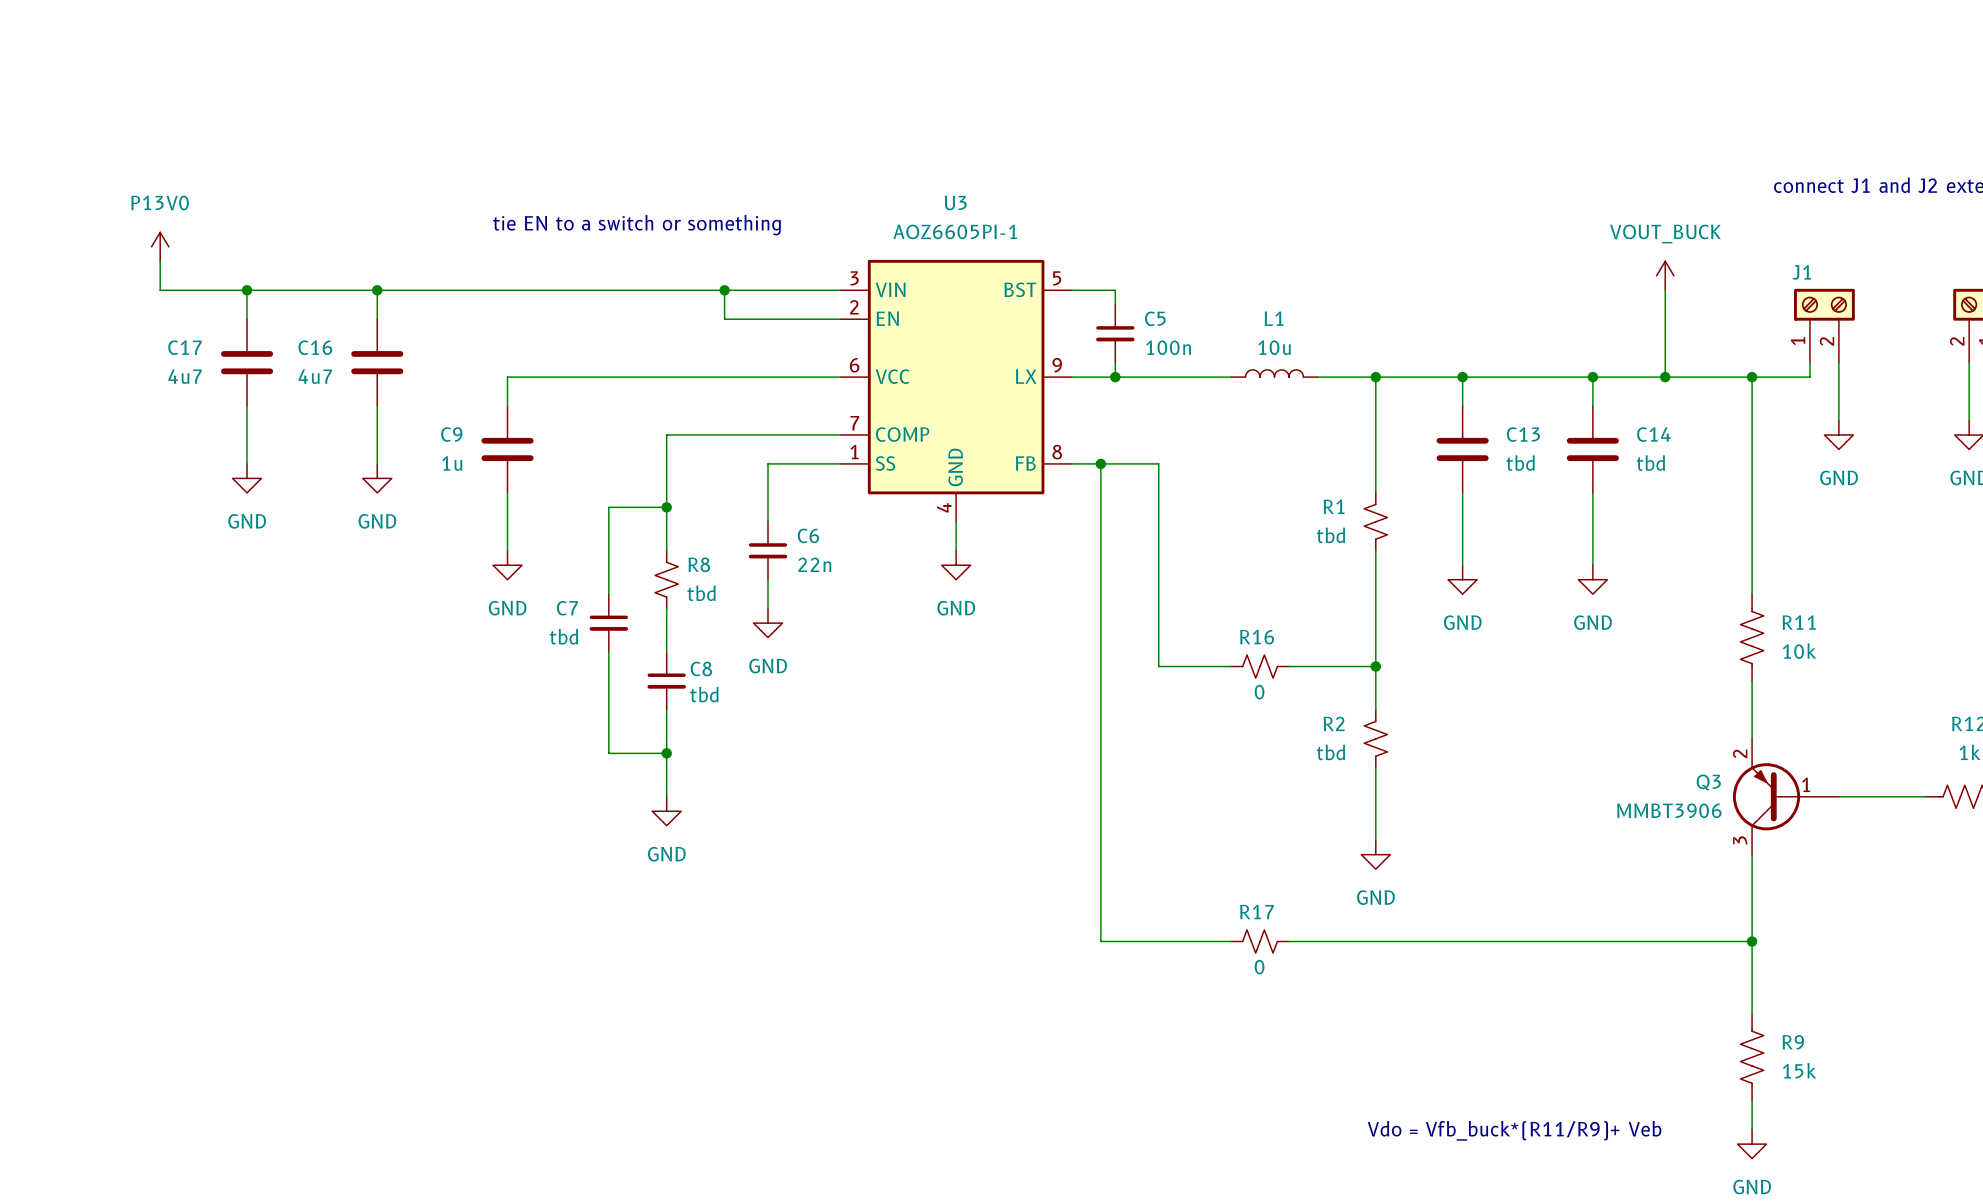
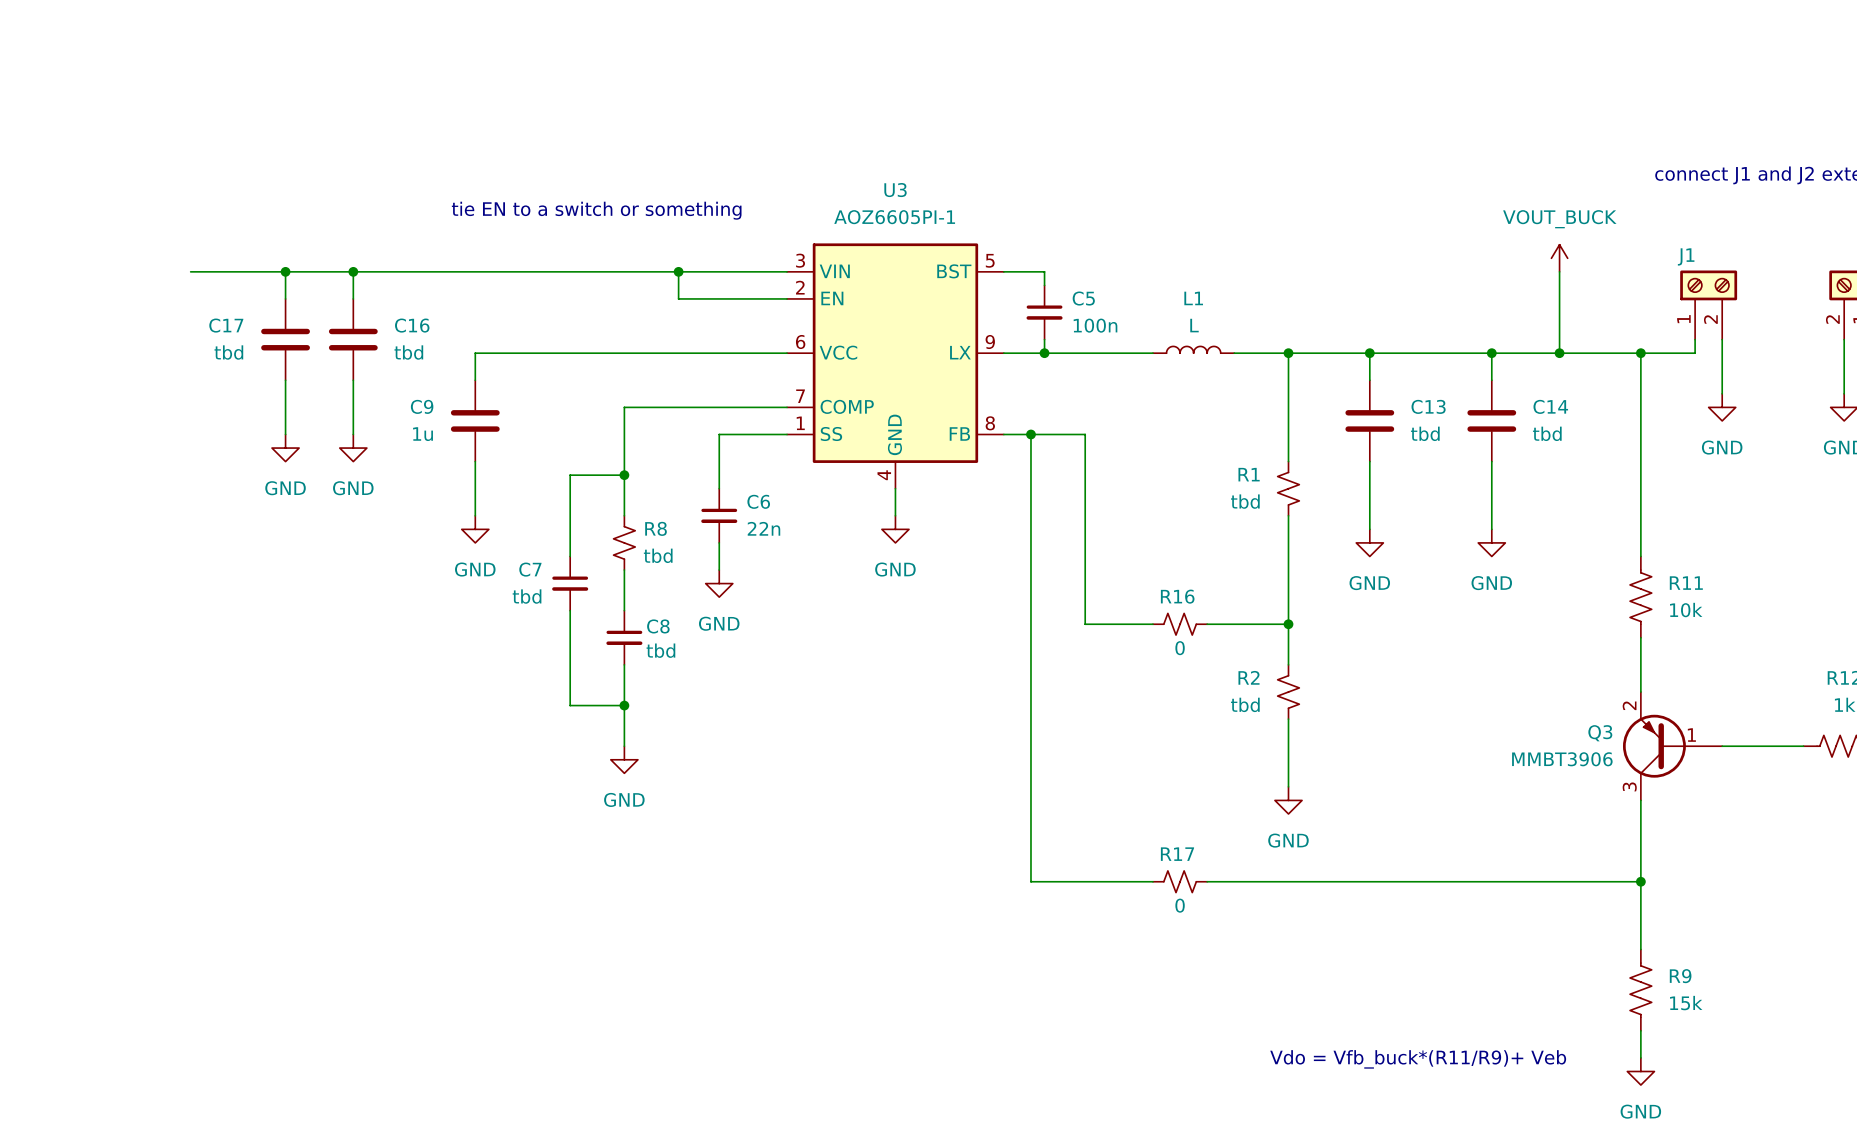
power symbol: P13V0 (160, 246) -> none
wire: (160, 261) (160, 290) (203, 290) -> none
wire: (247, 290) (247, 319) -> (285, 271) (285, 298)
junction position: (247, 290) -> (285, 271)
C16 name position: C16 (315, 347) -> C16 (412, 325)
L1 value: 10u (1274, 347) -> L (1194, 325)
C17 position: (247, 362) -> (285, 339)
C17 value: 4u7 (185, 376) -> tbd (228, 352)
C16 value: 4u7 (315, 376) -> tbd (408, 352)
wire: (247, 406) (247, 463) -> (285, 380) (285, 434)
power symbol position: GND (247, 478) -> GND (285, 448)

